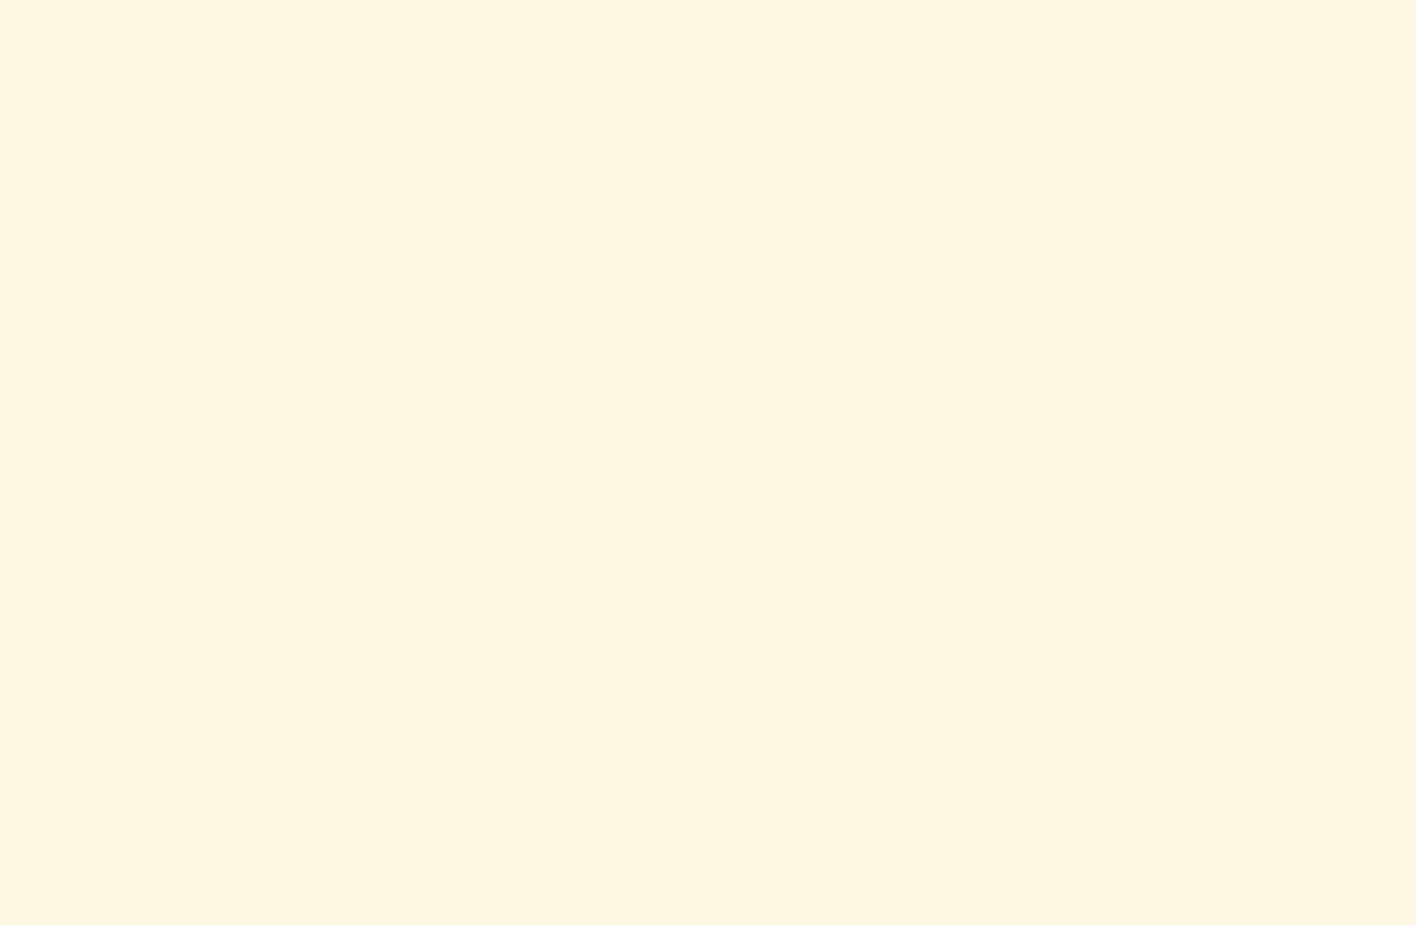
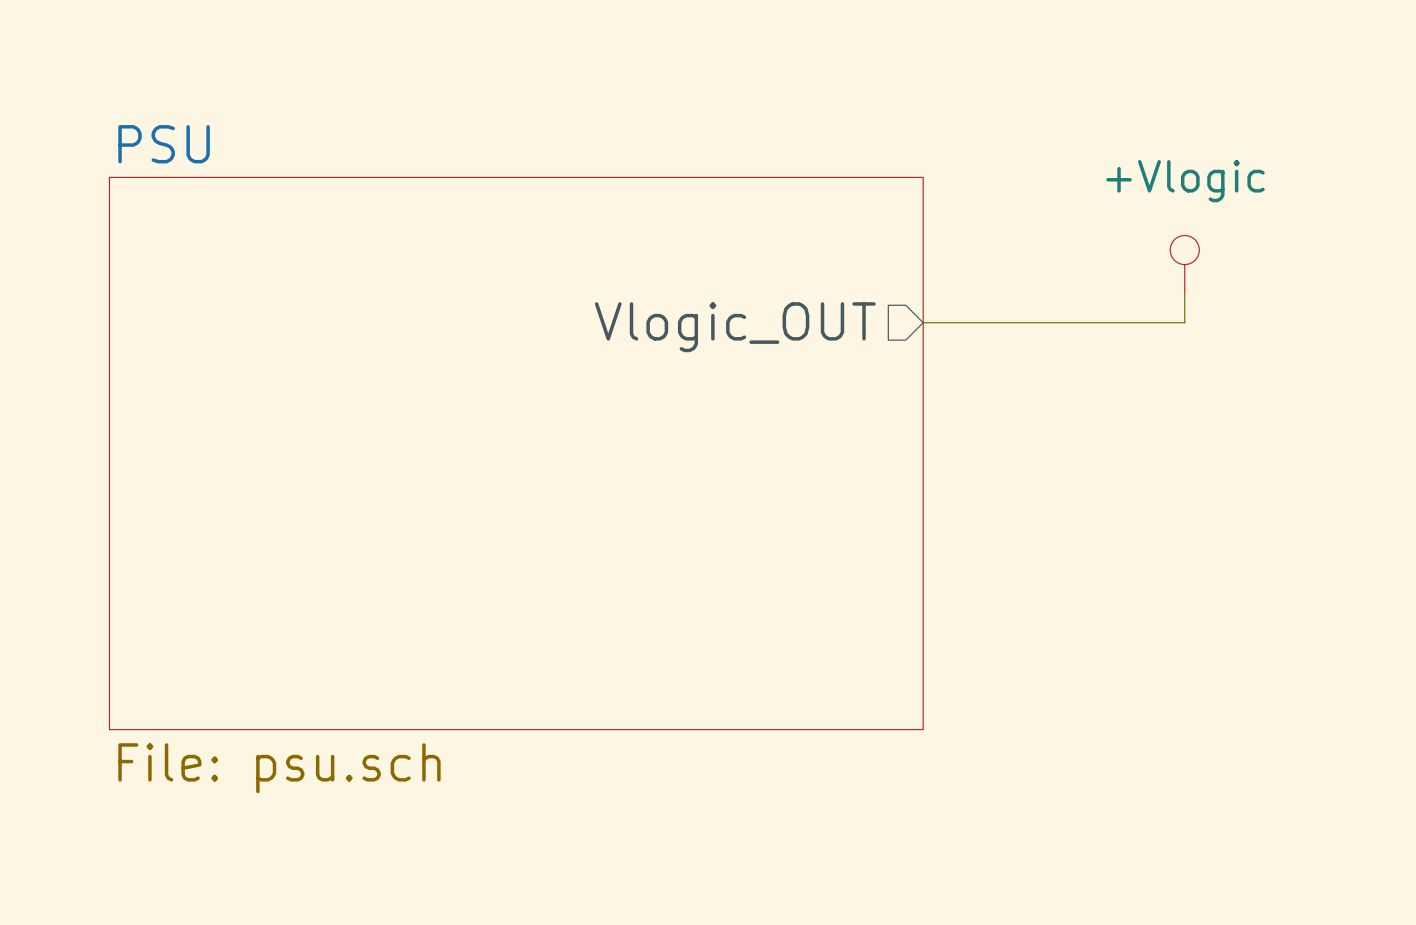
power symbol: none -> +Vlogic (1184, 264)
wire: none -> (1184, 293) (1184, 322) (923, 322)
sheet pin: none -> Vlogic_OUT (735, 327)
sheet PSU: none -> File: psu.sch (516, 453)

